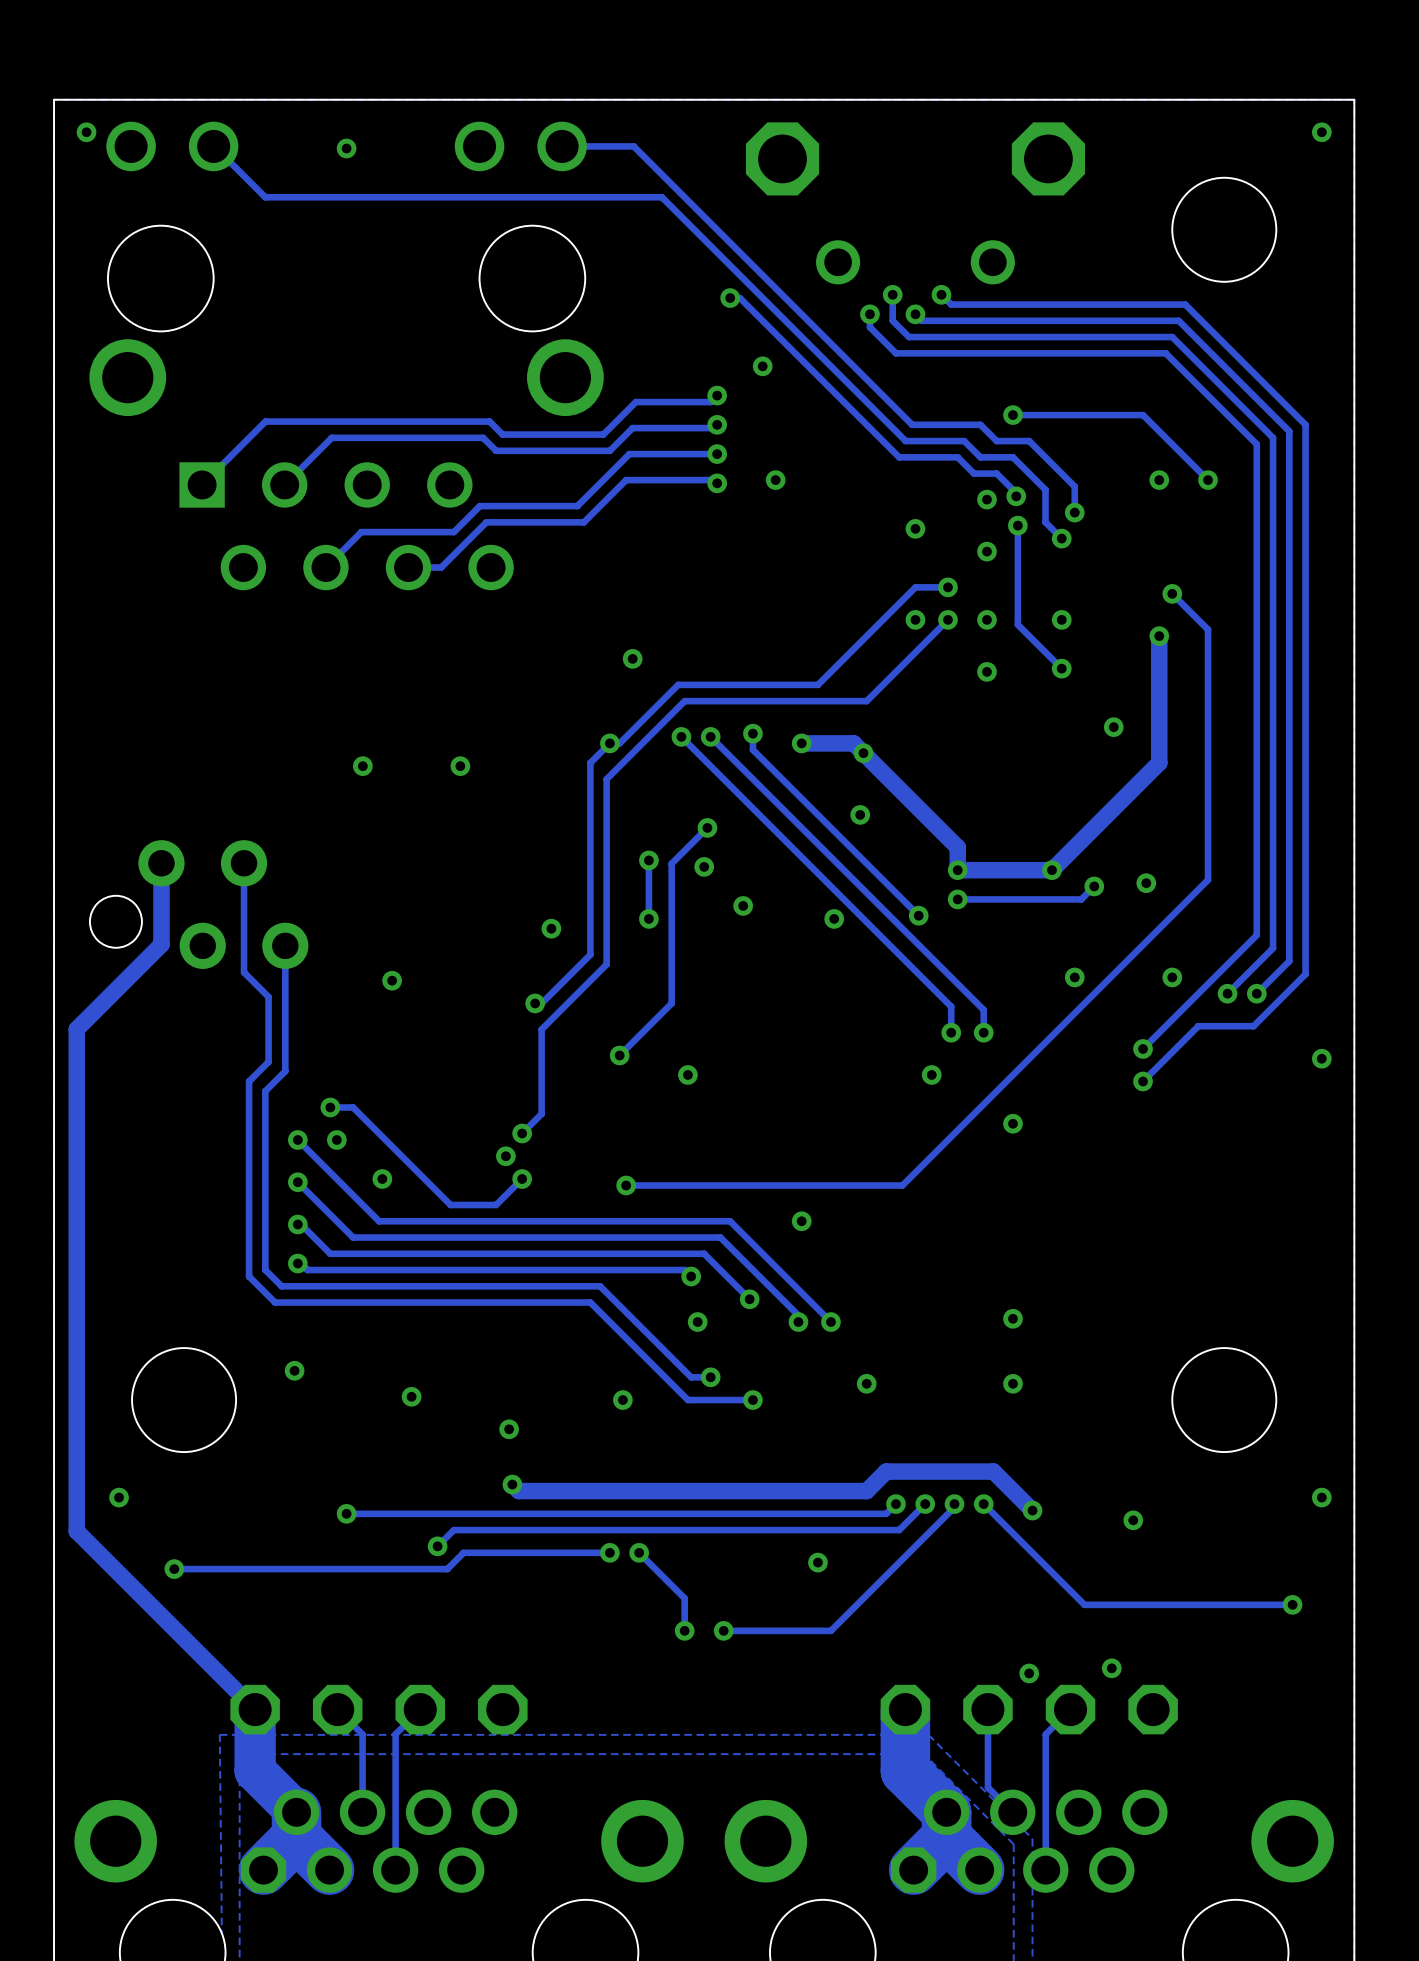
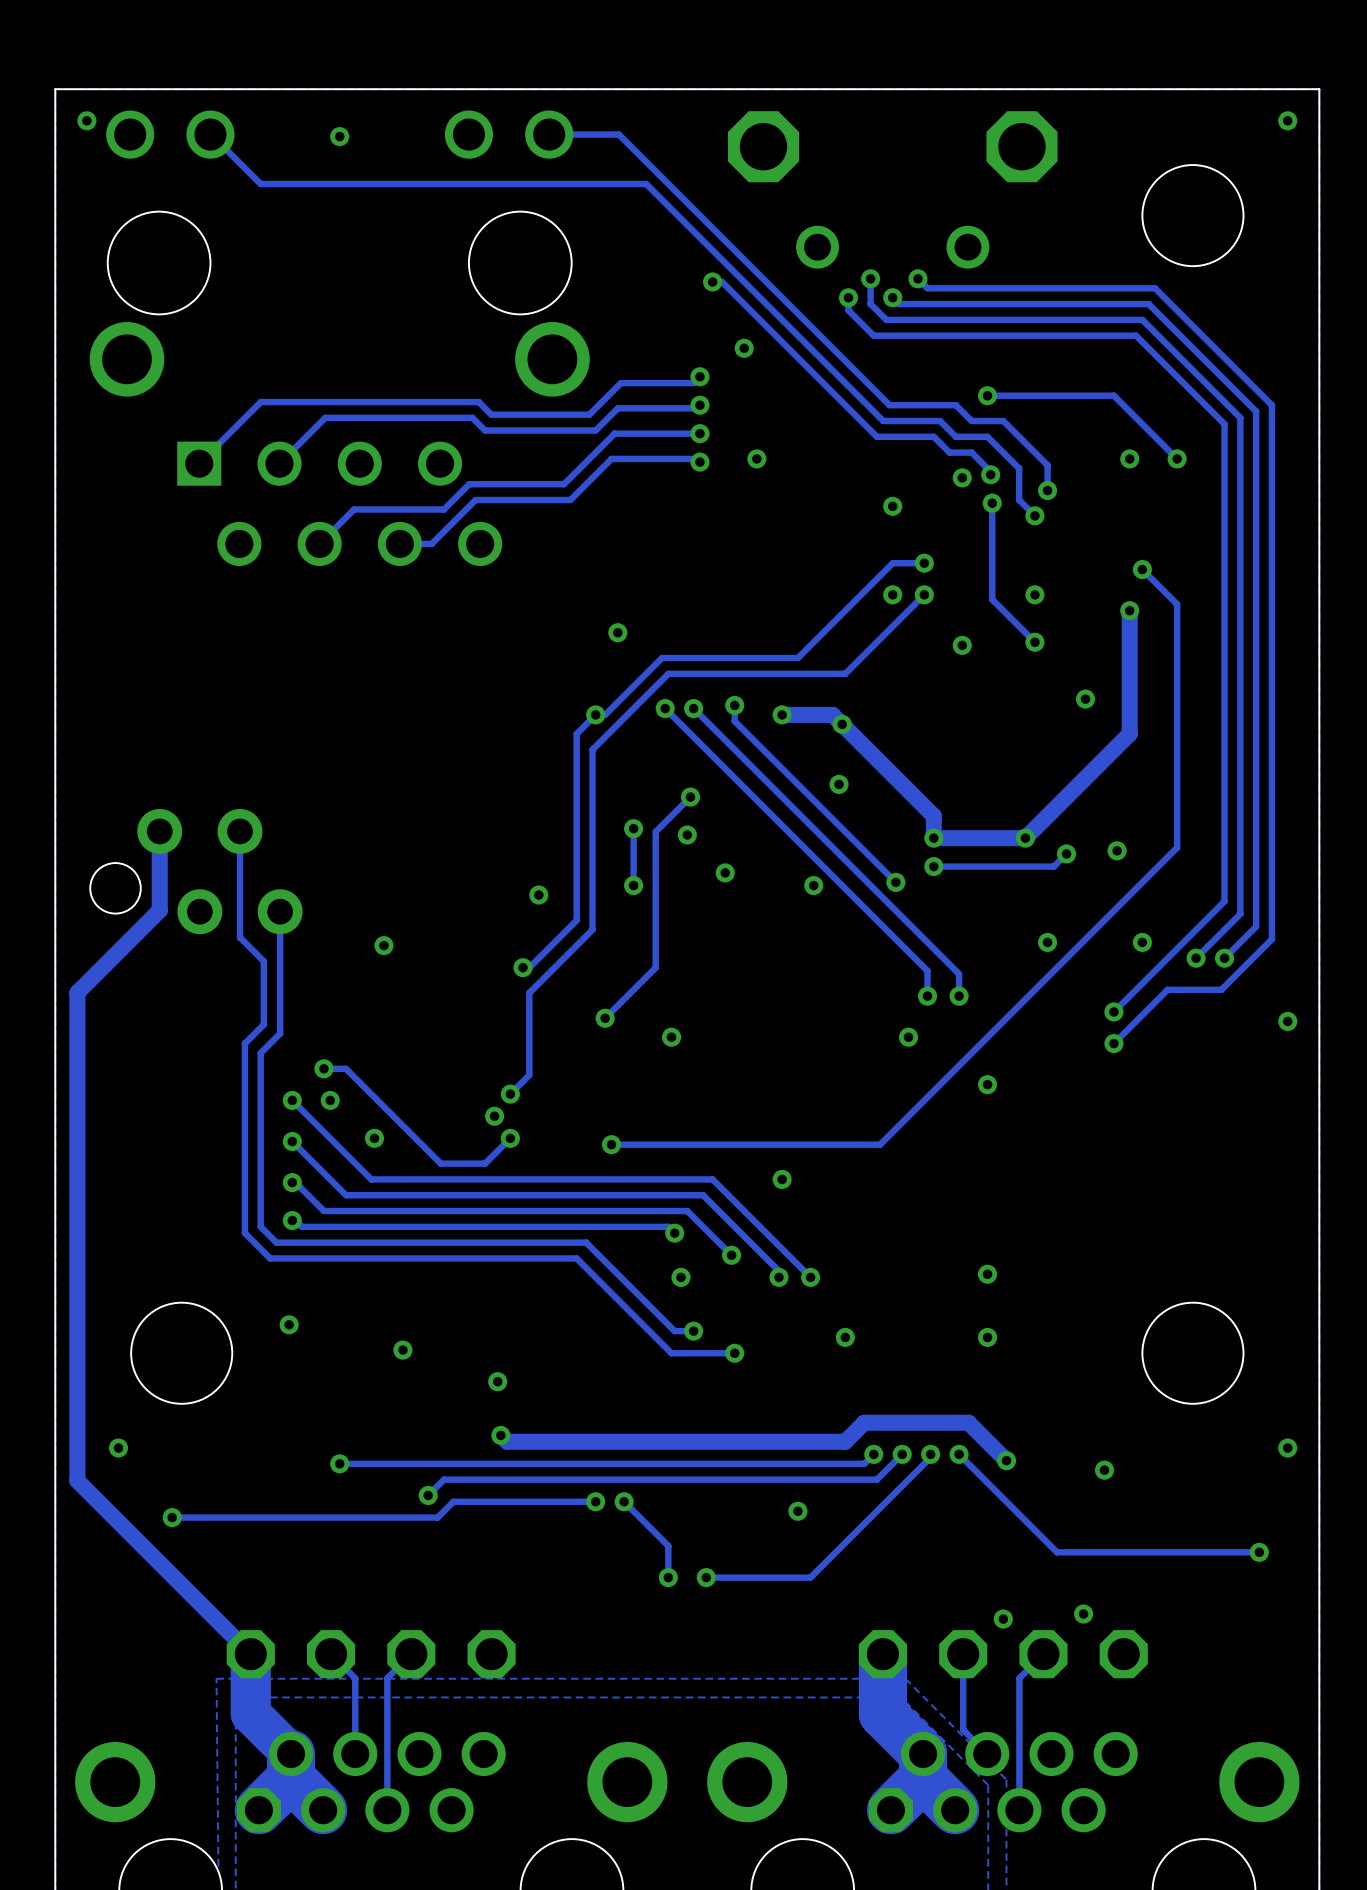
via: (986, 551) -> none
via: (986, 619) -> none
via: (362, 766) -> none
via: (460, 766) -> none
via: (622, 1400) -> none

